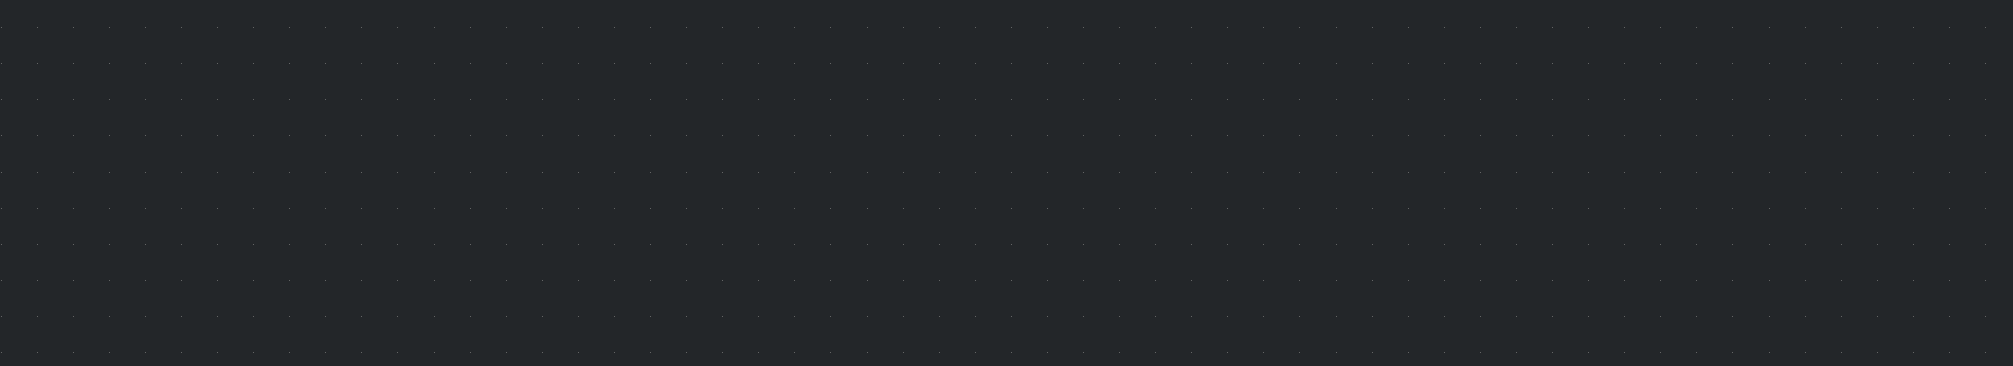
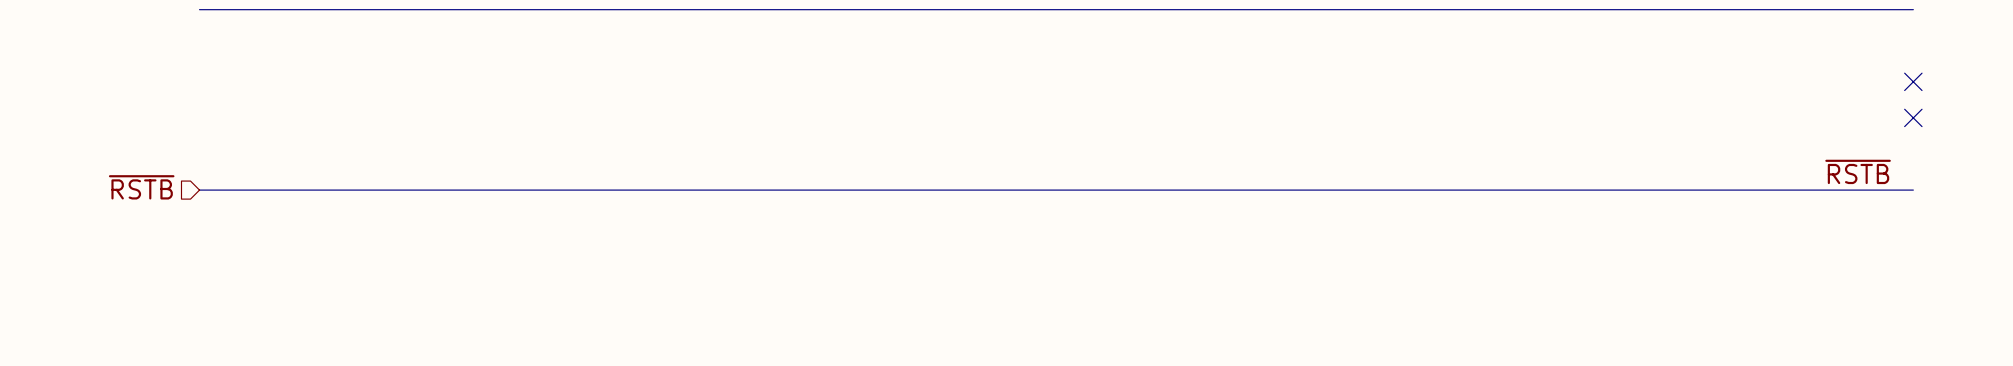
wire: none -> (199, 9) (1913, 9)
no-connect mark: none -> (1913, 81)
no-connect mark: none -> (1913, 117)
label: none -> ~{RSTB} (1858, 171)
hierarchical label: none -> ~{RSTB} (141, 187)
wire: none -> (199, 190) (1913, 190)

